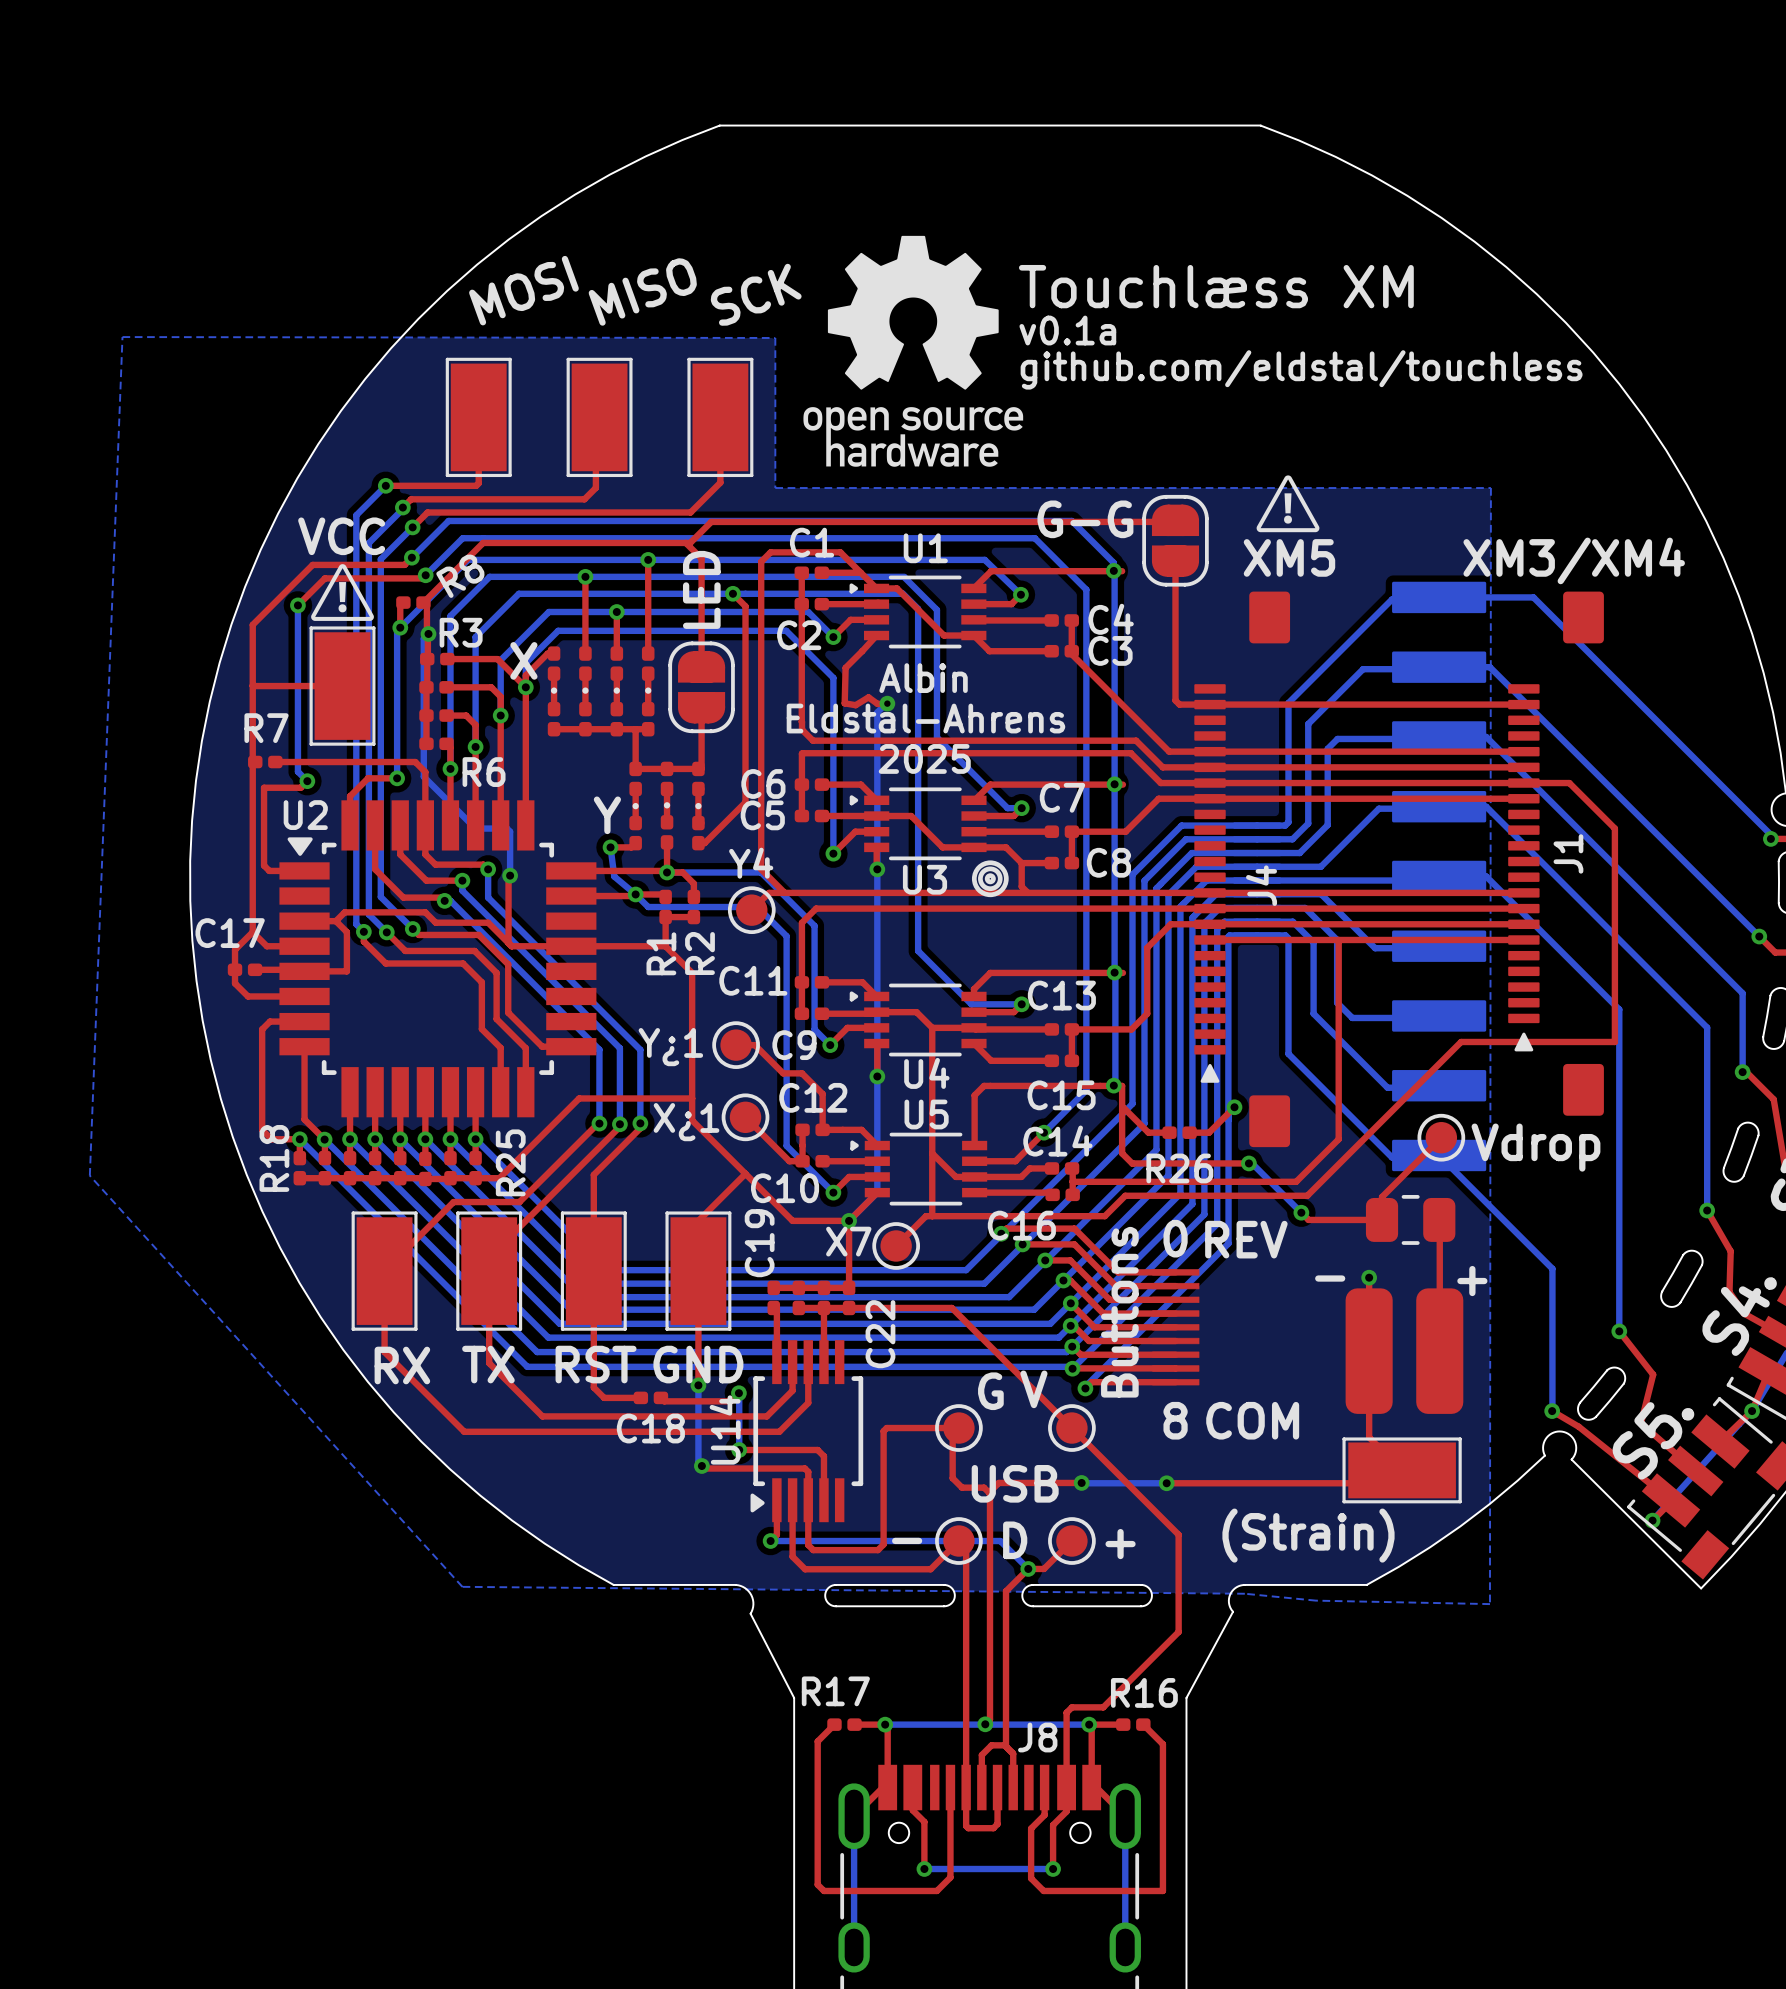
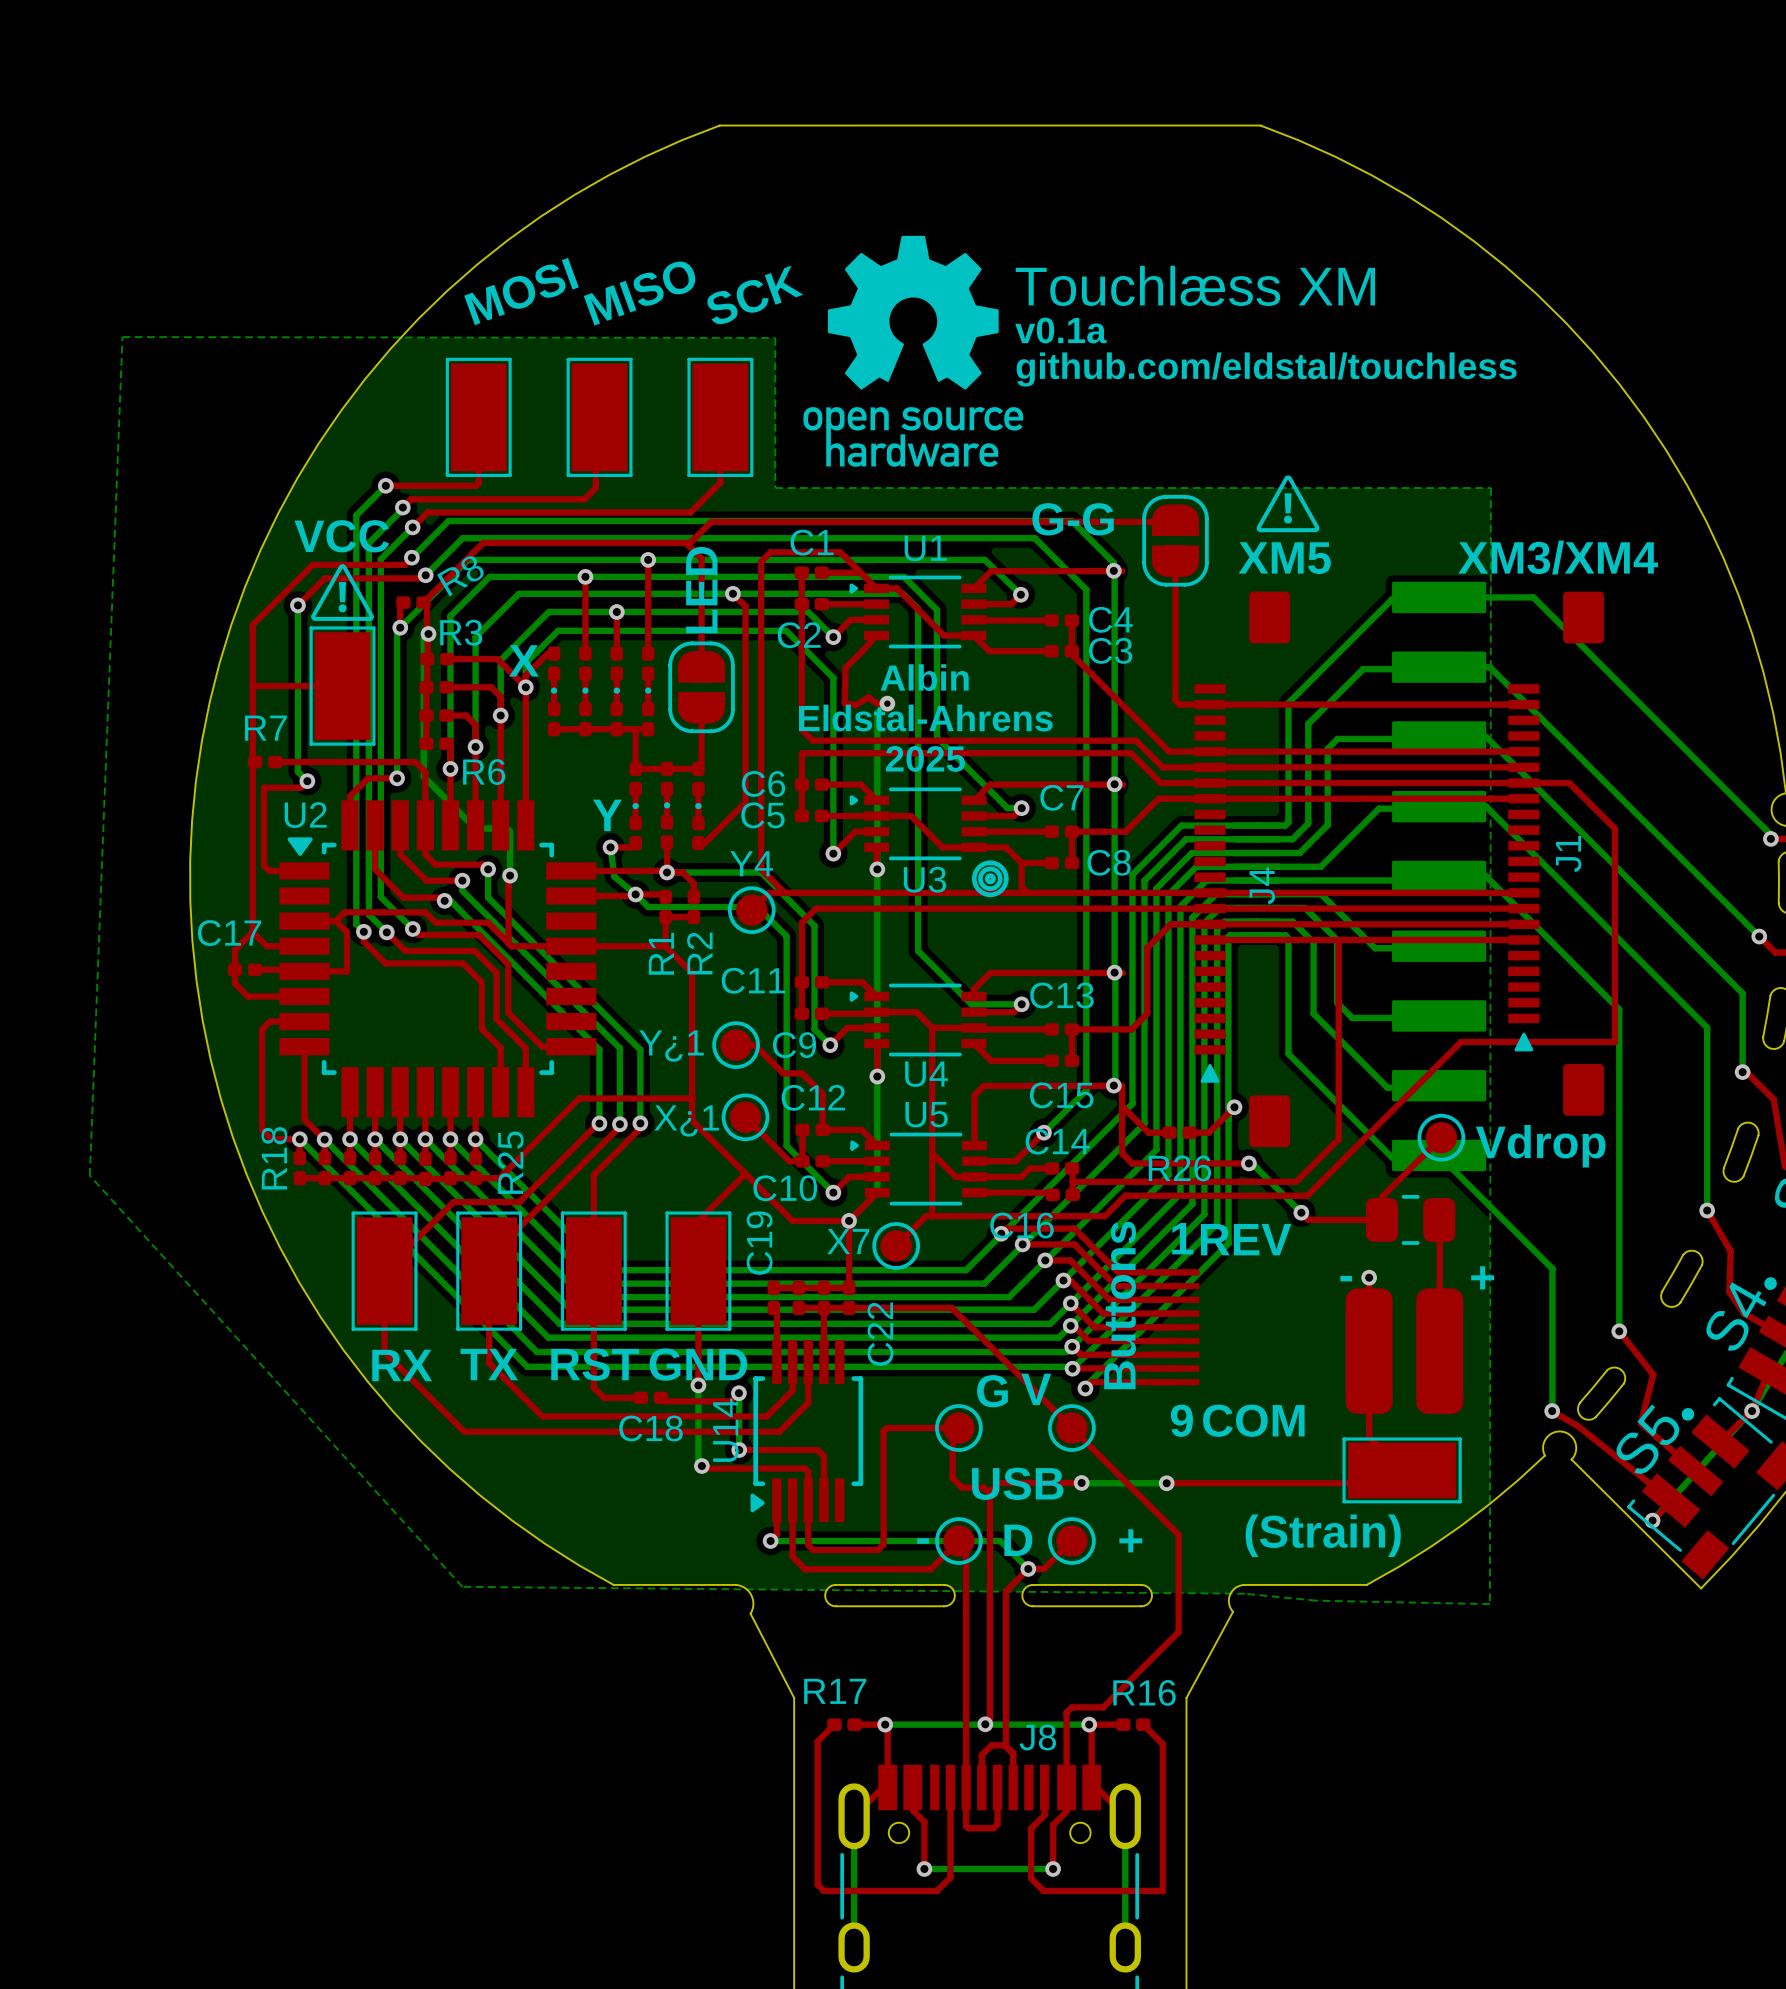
text: 0 (1175, 1238) -> 1 (1182, 1238)
text: 8 (1175, 1420) -> 9 (1181, 1420)

